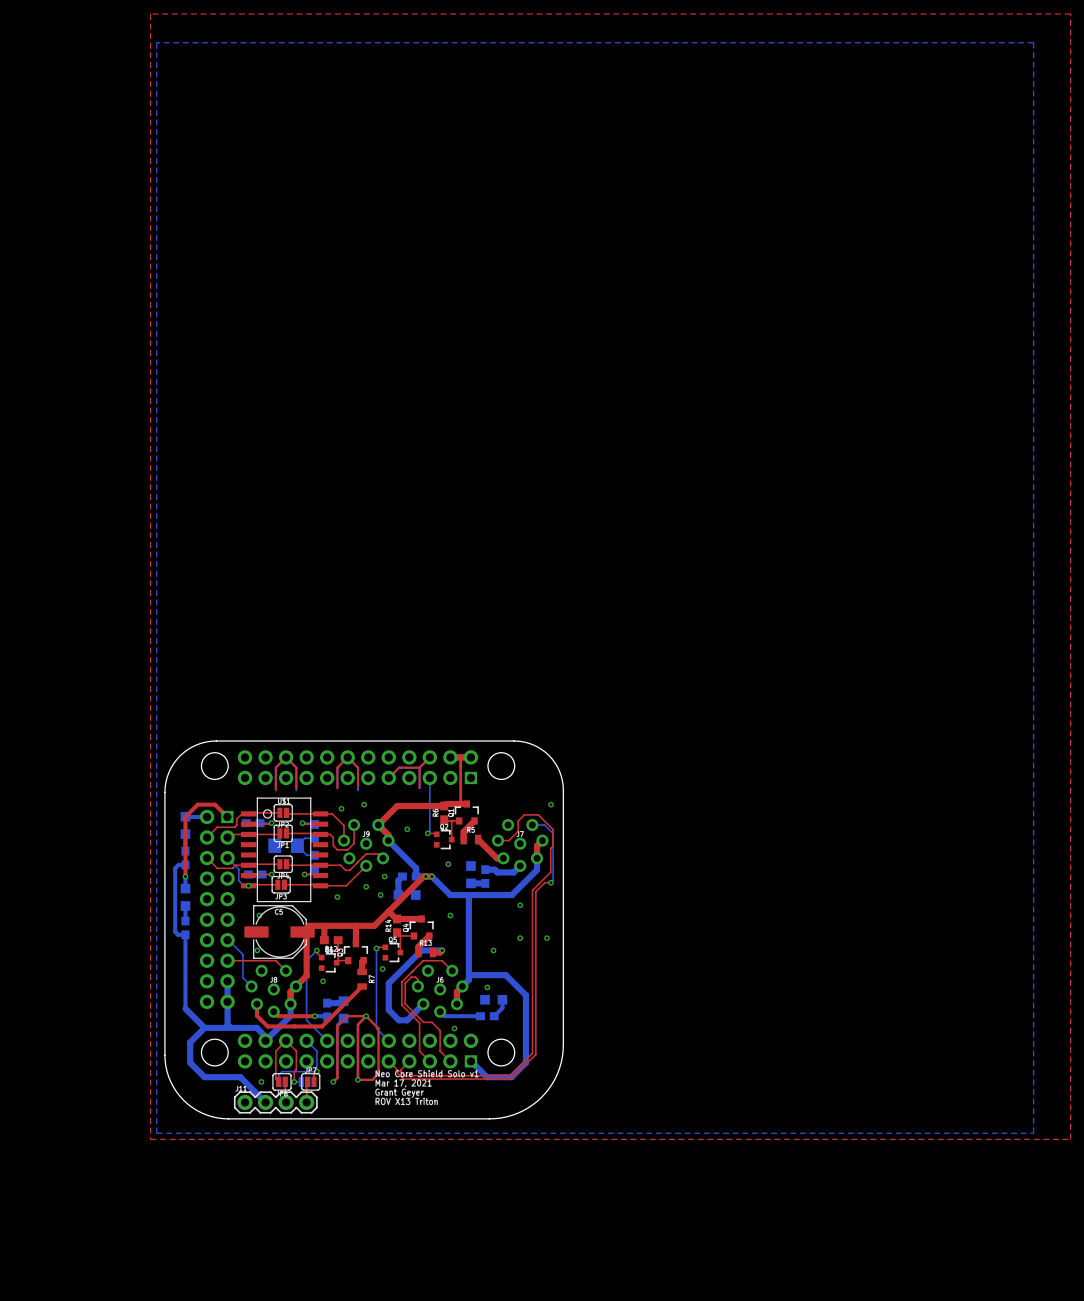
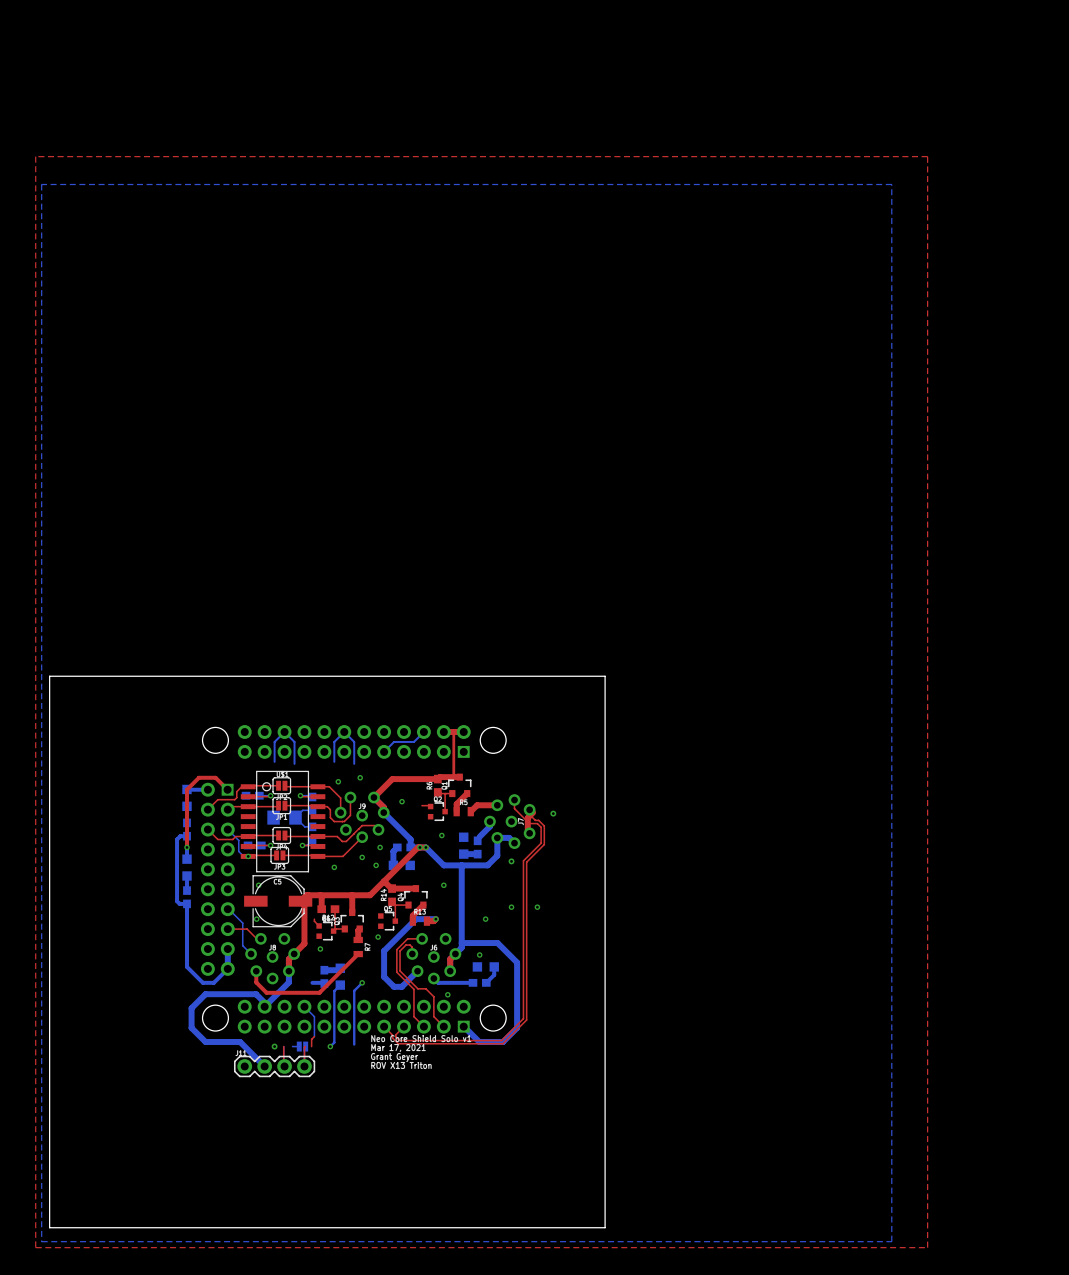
top zone outline: (150, 13) (1070, 13) (1070, 1139) (150, 1139) (150, 13) -> (35, 156) (927, 156) (927, 1247) (35, 1247) (35, 156)
bottom zone outline: (156, 42) (1033, 42) (1033, 1133) (156, 1133) (156, 42) -> (41, 184) (891, 184) (891, 1241) (41, 1241) (41, 184)
board edge: none -> (49, 676) (605, 676) (605, 1227) (49, 1227) (49, 676)
board edge: (216, 741) (518, 741) (537, 746) (552, 759) (559, 771) (563, 790) (563, 1050) (555, 1078) (537, 1101) (517, 1113) (495, 1118) (228, 1118) (201, 1112) (179, 1096) (170, 1082) (165, 1060) (165, 787) (170, 768) (183, 752) (201, 743) (216, 741) -> none
top track: (429, 757) (419, 767) -> none
bottom track: (419, 767) (419, 788) -> none
top track: (419, 767) (399, 767) (388, 777) -> none
top track: (419, 767) (419, 788) -> none
bottom track: (429, 777) (429, 831) (427, 833) -> none
top track: (357, 786) (357, 767) (347, 757) (337, 767) (337, 788) -> none
top track: (296, 788) (296, 767) (286, 757) (275, 767) (275, 790) -> none
via: (551, 804) -> none
bottom track: (532, 825) (544, 825) (553, 833) (553, 880) (551, 882) -> none
via: (427, 833) -> none
top track: (478, 839) (496, 858) (503, 858) -> (470, 811) (477, 805) (497, 805)
top track: (497, 840) (508, 840) (518, 831) (518, 821) (524, 814) (538, 814) (553, 829) (550, 855) -> (514, 800) (514, 808) (529, 823) (537, 823) (541, 827)
bottom track: (542, 840) (537, 846) (537, 869) (512, 895) (495, 895) -> (514, 843) (509, 837) (497, 837) (497, 855) (487, 865)
via: none -> (553, 813)
part rotation: 0° (520, 845) -> 90° clockwise (509, 821)
bottom track: none -> (489, 821) (489, 826) (479, 836)
bottom track: (520, 865) (513, 872) (497, 872) (494, 869) (485, 869) -> none
top track: (544, 882) (551, 882) -> (535, 853) (544, 844) (544, 825) (529, 814) (529, 809)
via: (551, 882) -> none
via: none -> (511, 861)
via: (520, 905) -> none
top track: (385, 947) (376, 948) -> none
bottom track: (376, 948) (376, 1028) (388, 1040) -> none
via: (376, 948) -> none
bottom track: (316, 950) (306, 960) (306, 1020) (327, 1040) -> none
via: (316, 950) -> none
top track: (247, 960) (275, 960) (285, 970) -> (247, 929) (260, 942)
top track: (452, 970) (442, 960) (423, 960) (412, 971) -> (422, 938) (406, 939)
bottom track: (185, 999) (185, 1008) (204, 1027) -> (187, 966) (202, 982) (213, 982) (227, 968)
bottom track: (227, 1001) (227, 1024) (230, 1027) -> none
top track: (273, 1011) (278, 1016) (314, 1016) -> none
via: (314, 1016) -> none
top track: (366, 1016) (357, 1024) (357, 1079) (372, 1079) (378, 1073) (378, 1028) (366, 1016) -> none
top track: (366, 1016) (347, 1016) (337, 1026) (337, 1077) (333, 1081) -> none
bottom track: (316, 1071) (281, 1071) (278, 1074) (278, 1081) -> none
via: (316, 1071) -> none
via: (357, 1079) -> none
via: (261, 1081) -> none
via: none -> (274, 1046)
top track: (278, 1081) (275, 1079) (275, 1051) (286, 1040) (296, 1051) (294, 1081) -> none
part: (281, 1081) -> none
via: (294, 1081) -> none
part: (310, 1081) -> none

